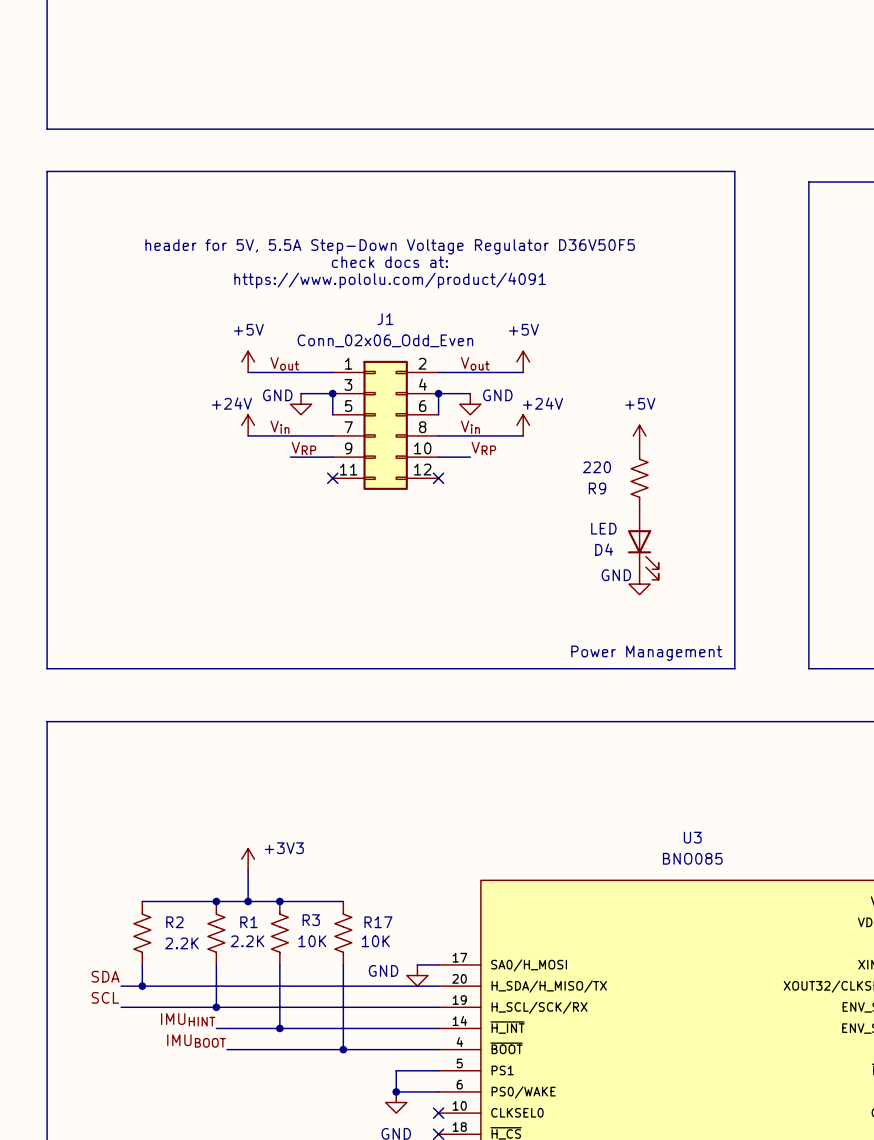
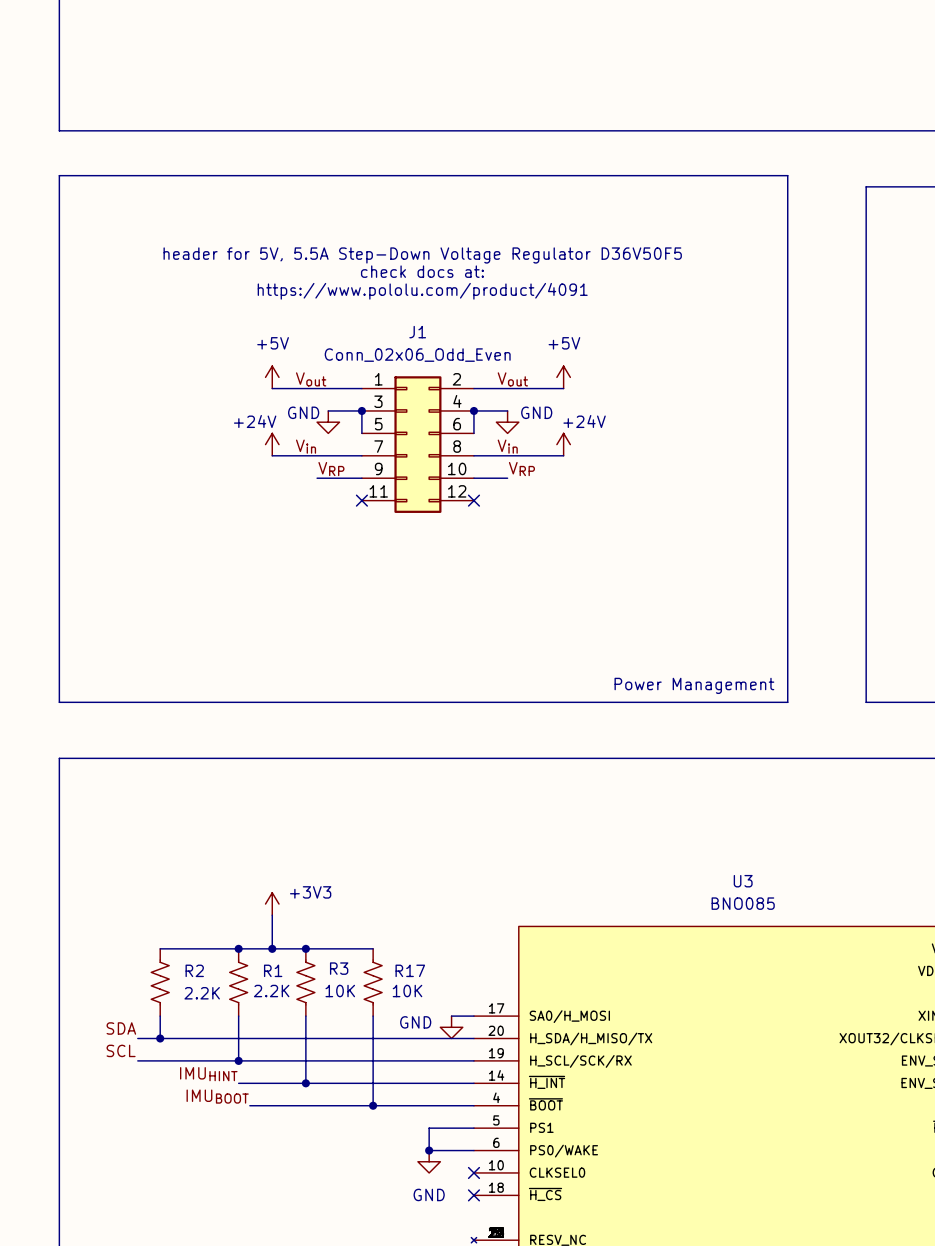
power symbol: +5V (639, 435) -> none
R9: 220 (639, 478) -> none
D4: LED (643, 544) -> none
power symbol: GND (639, 584) -> none

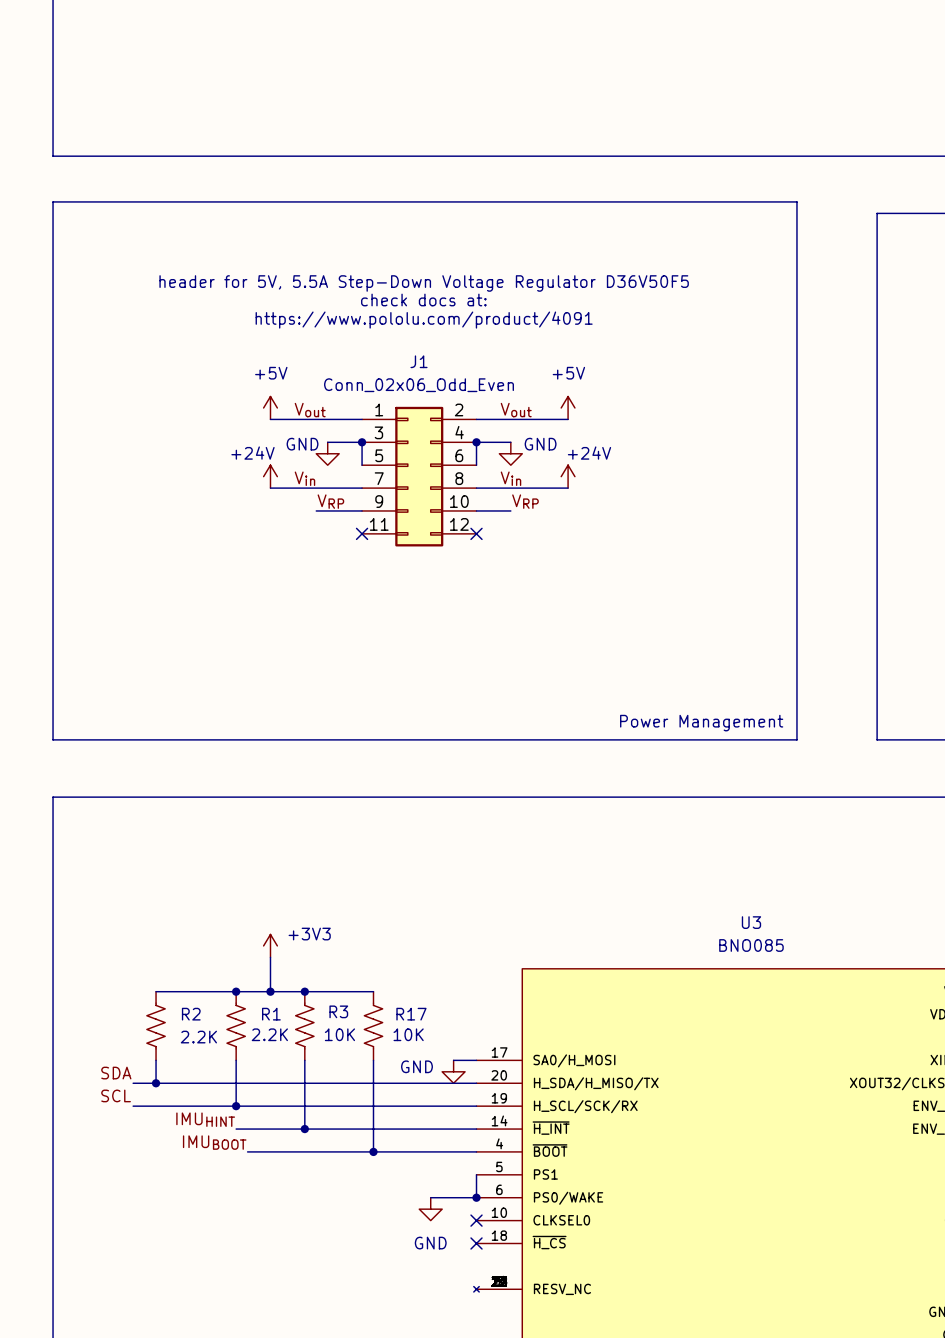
wire: (473, 1128) (429, 1128) (429, 1150) -> (476, 1174) (476, 1197)
junction position: (429, 1150) -> (476, 1197)

